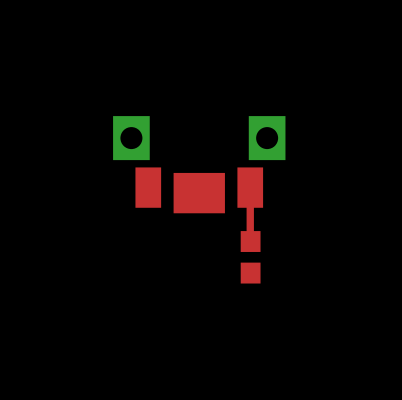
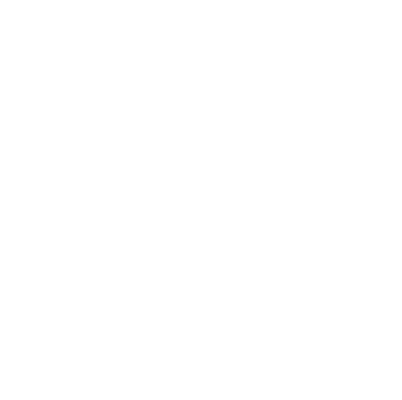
part: (199, 164) -> none
top track: (250, 187) (250, 241) -> none
part: (250, 257) -> none

